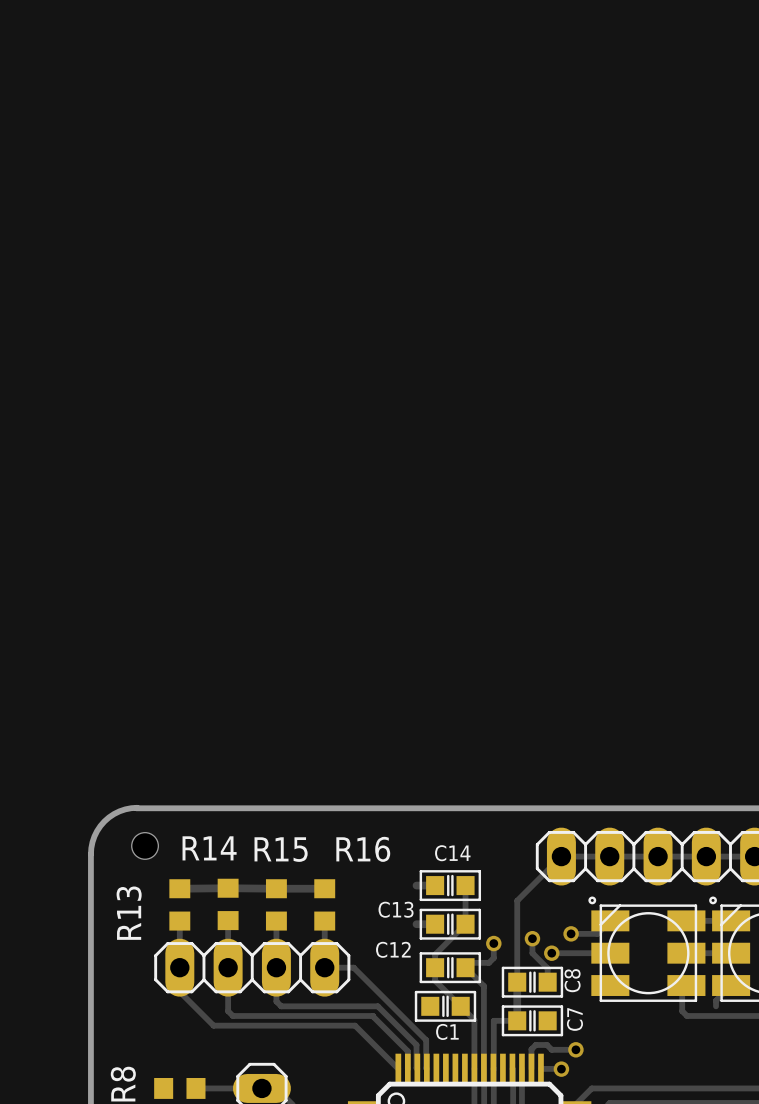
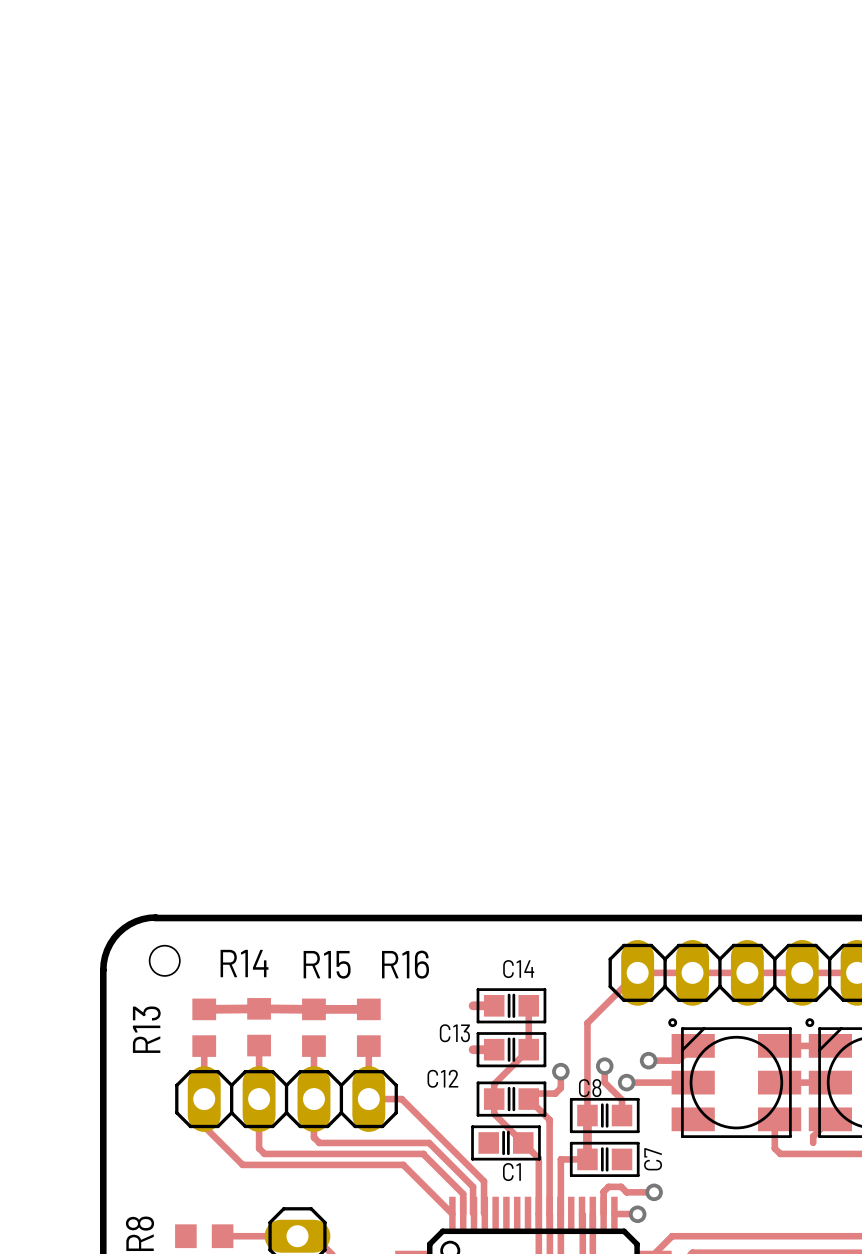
C8 name rotation: 0° (572, 980) -> 90° clockwise (590, 1088)
C8 name position: C8 (572, 980) -> C8 (590, 1088)

